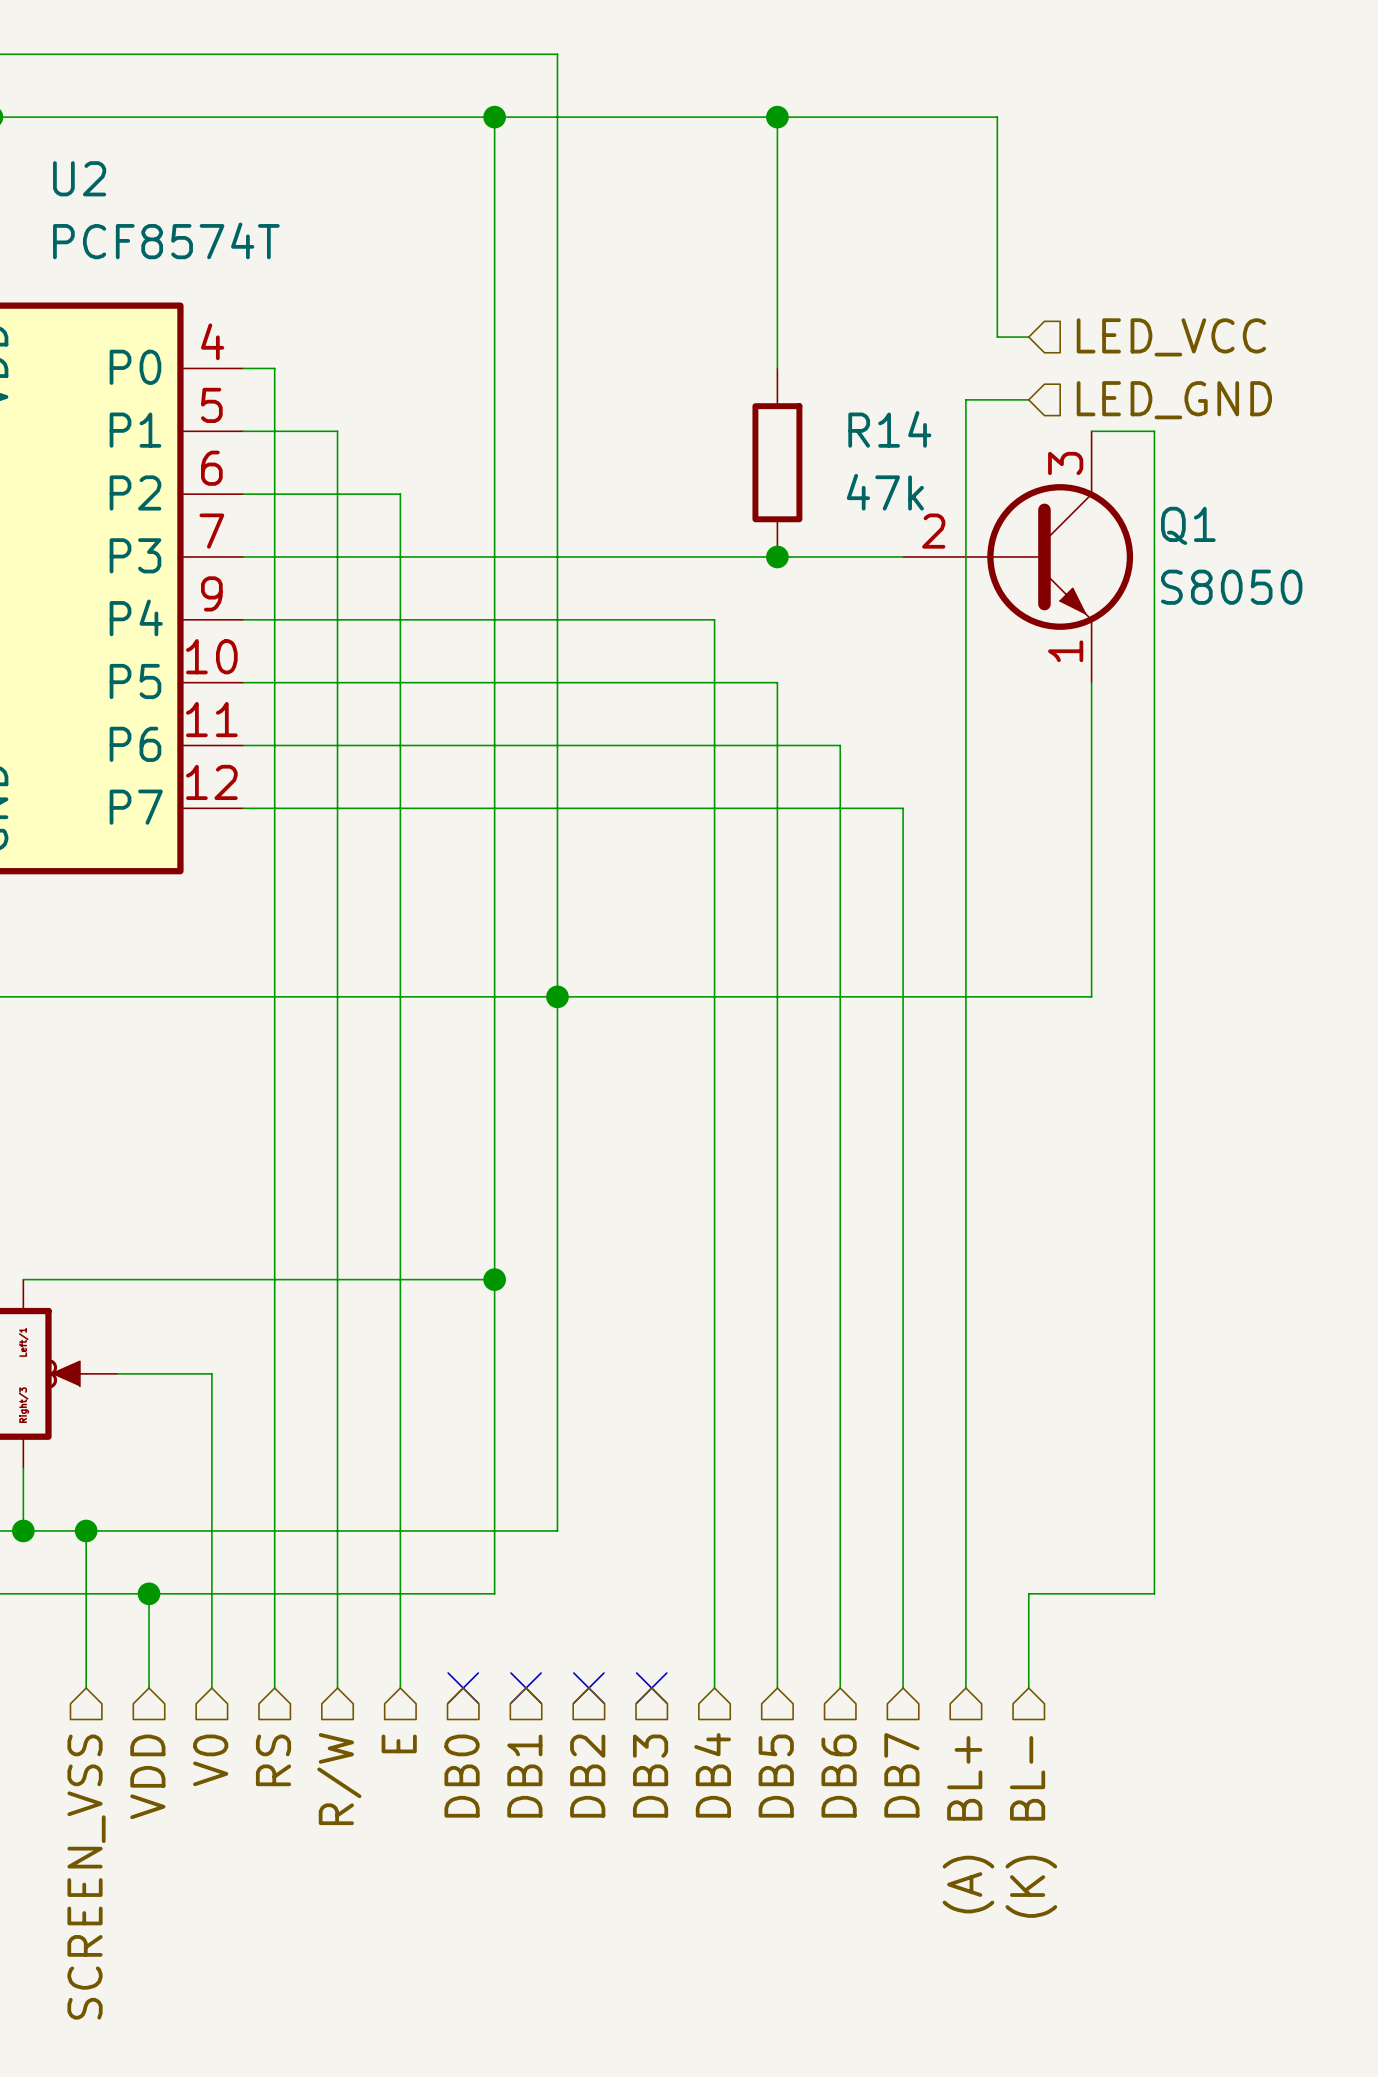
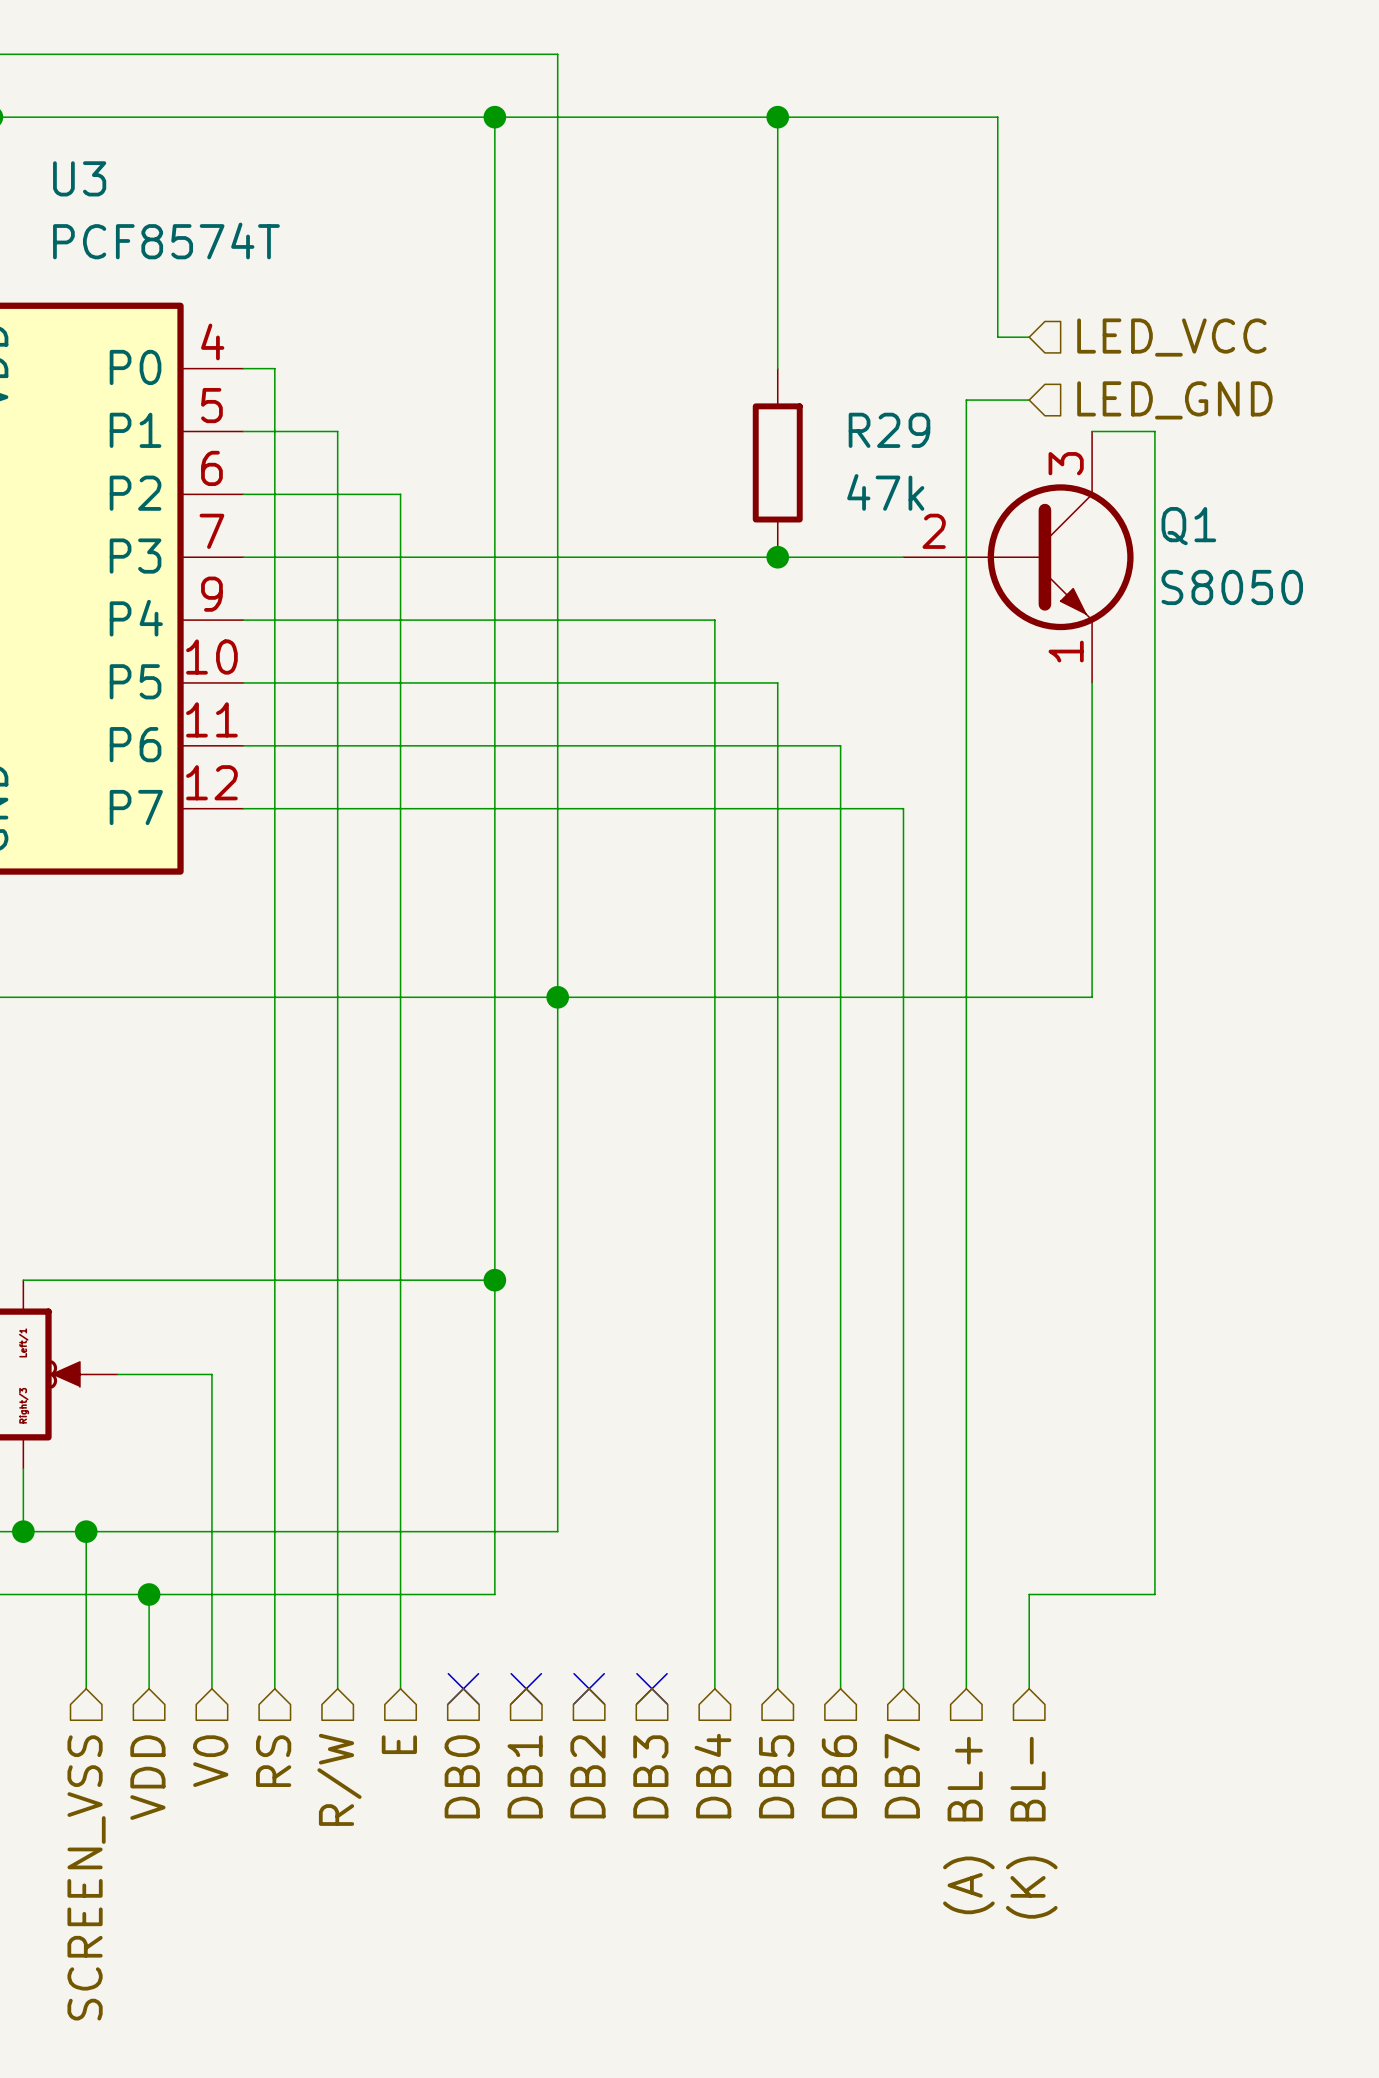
U2 name: U2 (79, 178) -> U3 (79, 178)
R14 name: R14 (889, 429) -> R29 (889, 430)

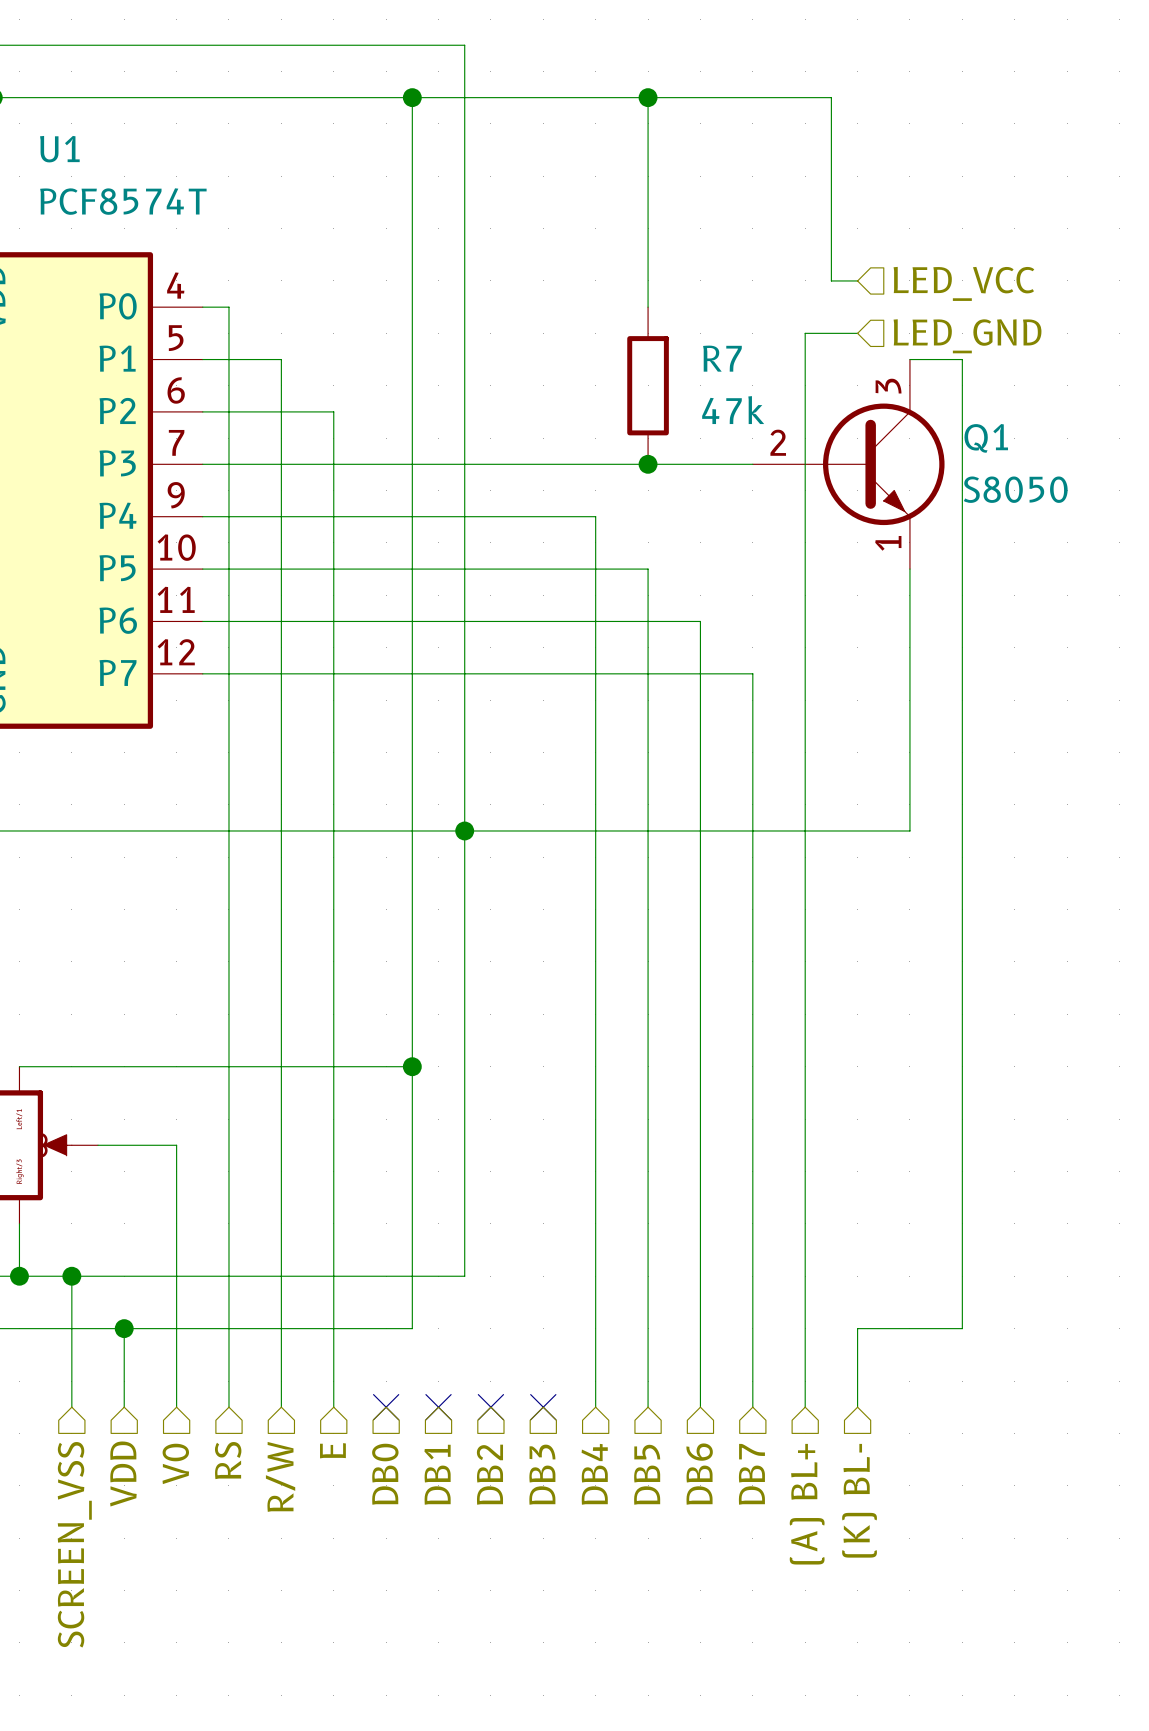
U3 name: U3 (79, 178) -> U1 (59, 149)
R29 name: R29 (889, 430) -> R7 (722, 358)

